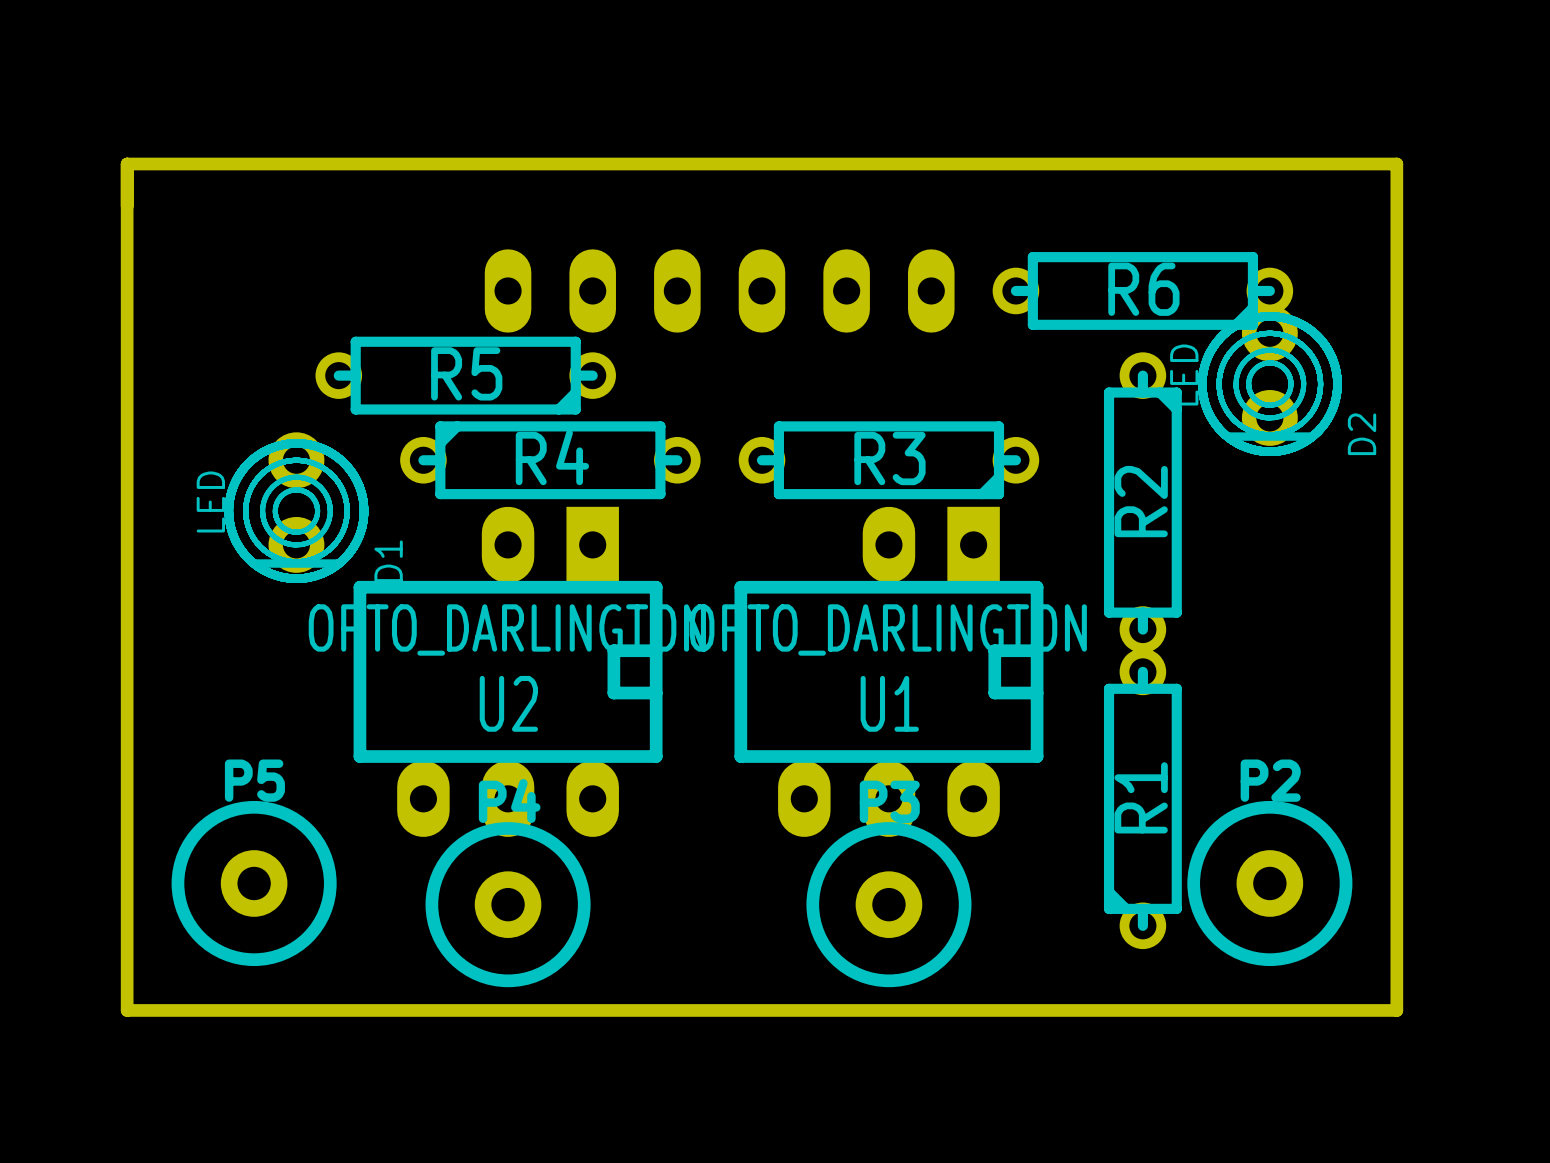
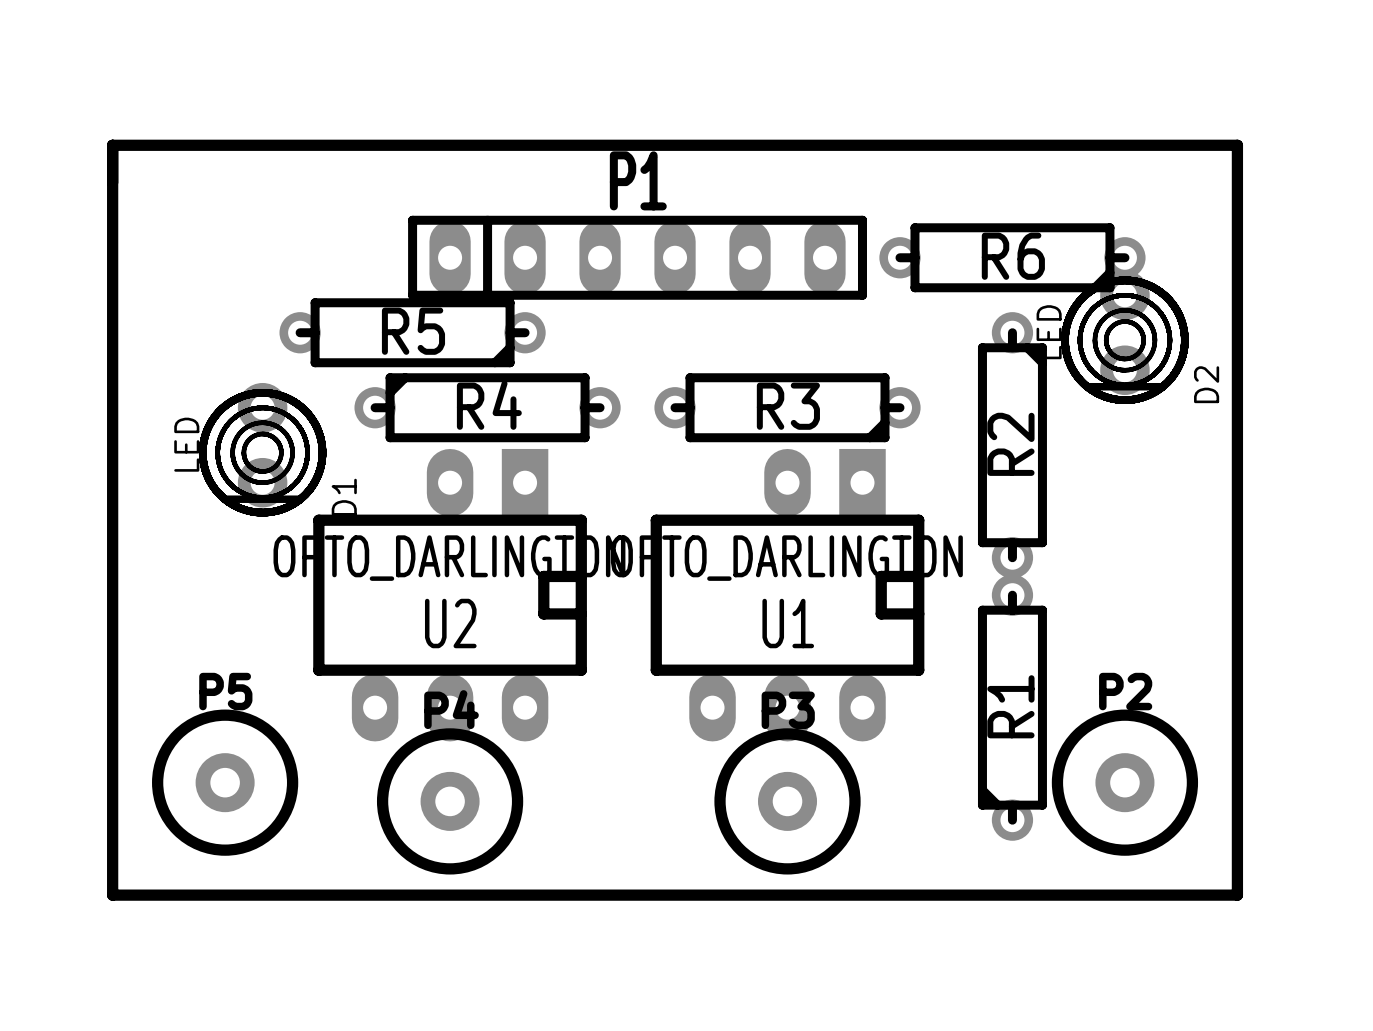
P1 side: bottom (719, 290) -> top (637, 257)

